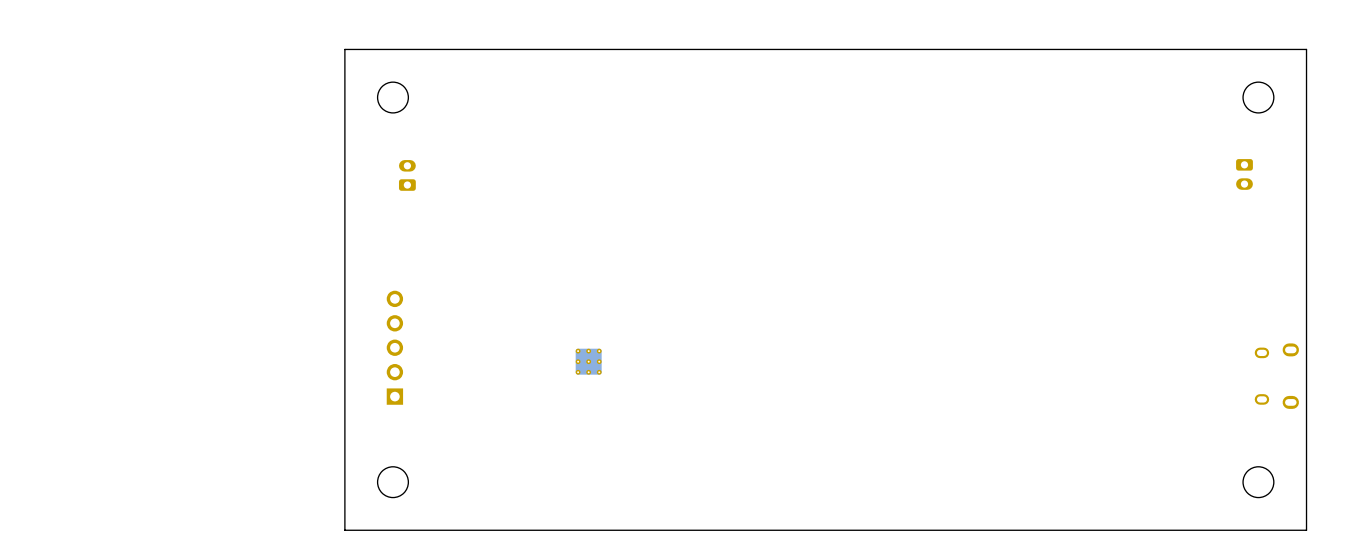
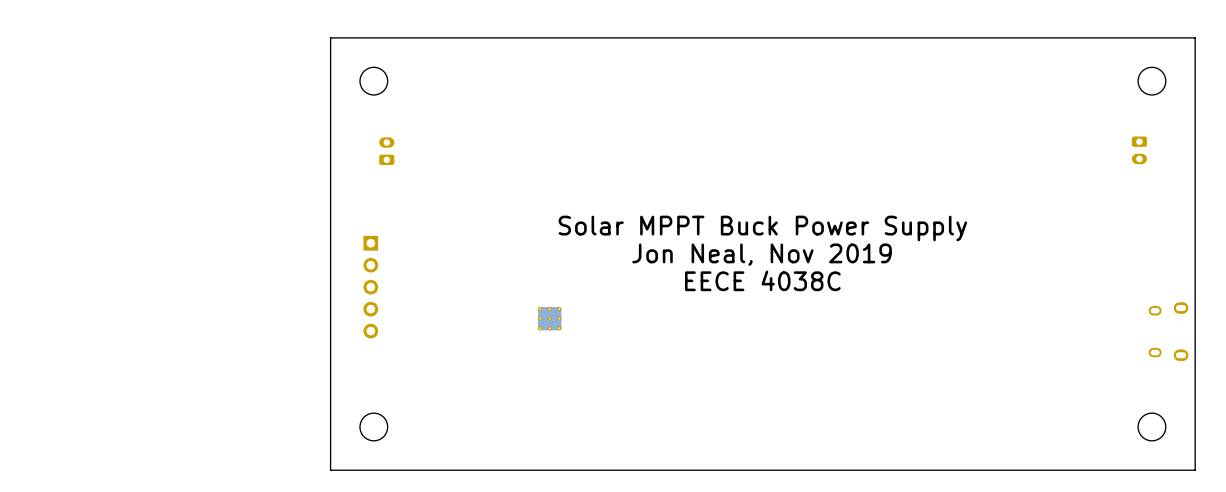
text: none -> Solar MPPT Buck Power Supply (762, 228)
text: none -> Jon Neal, Nov 2019 (762, 254)
text: none -> EECE 4038C (762, 280)
part rotation: 0° (394, 347) -> 180° (370, 287)

